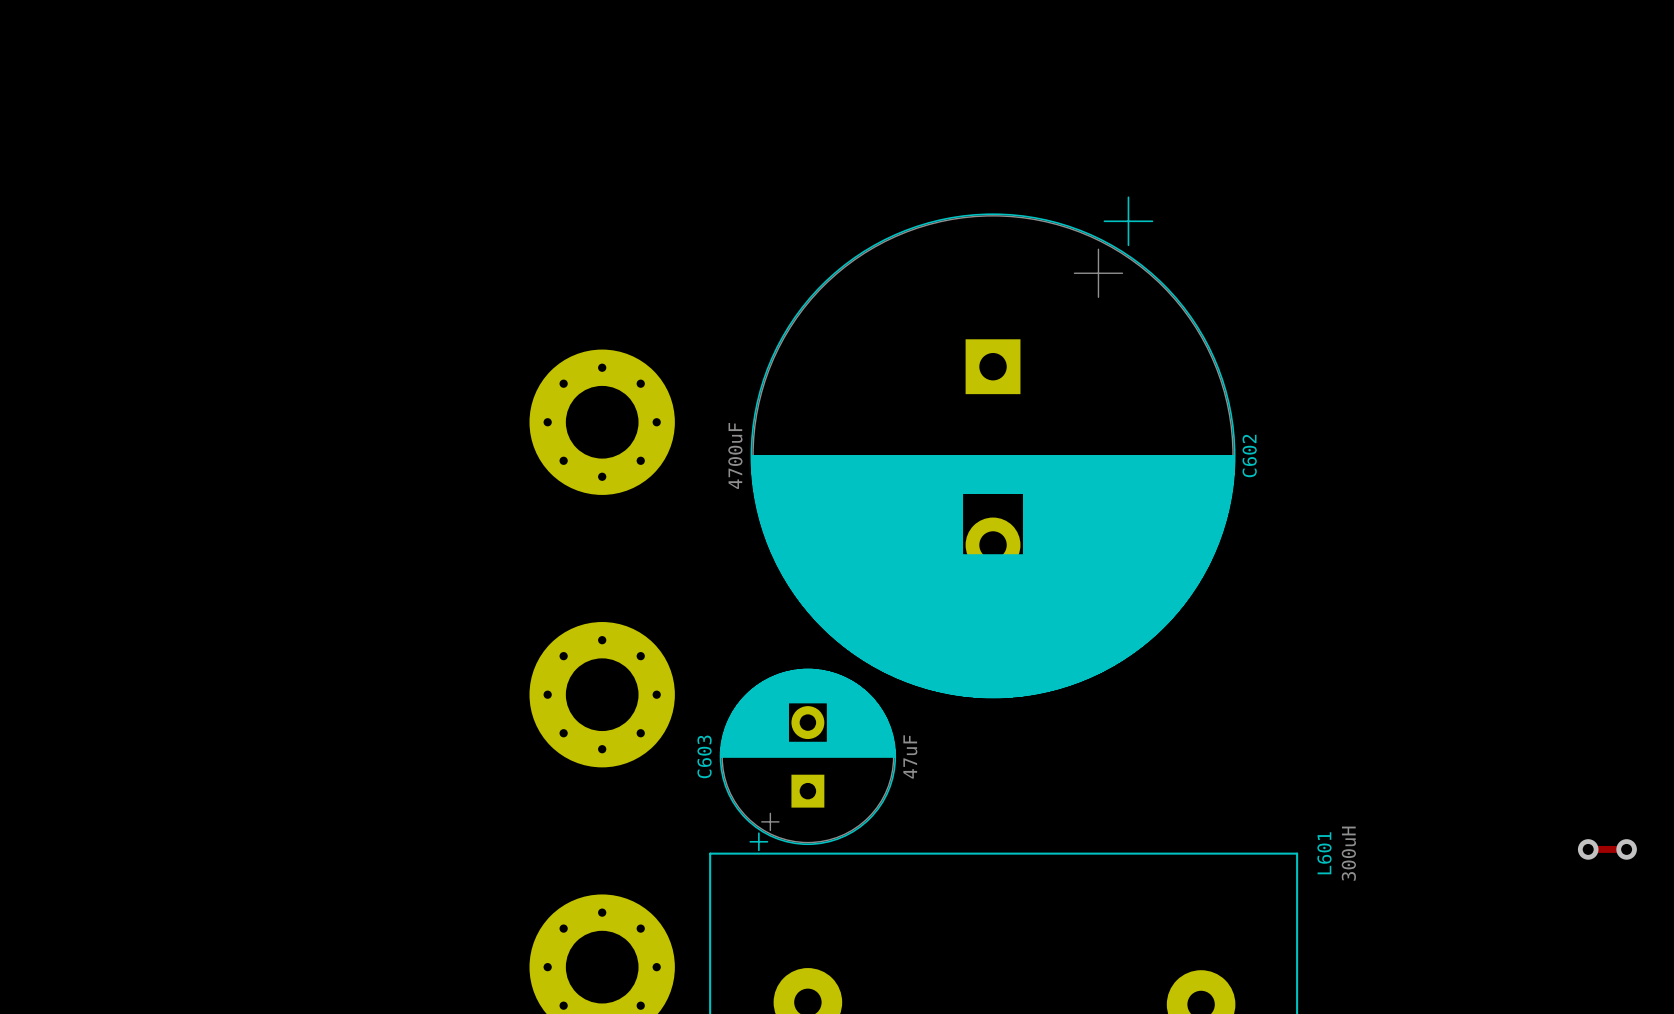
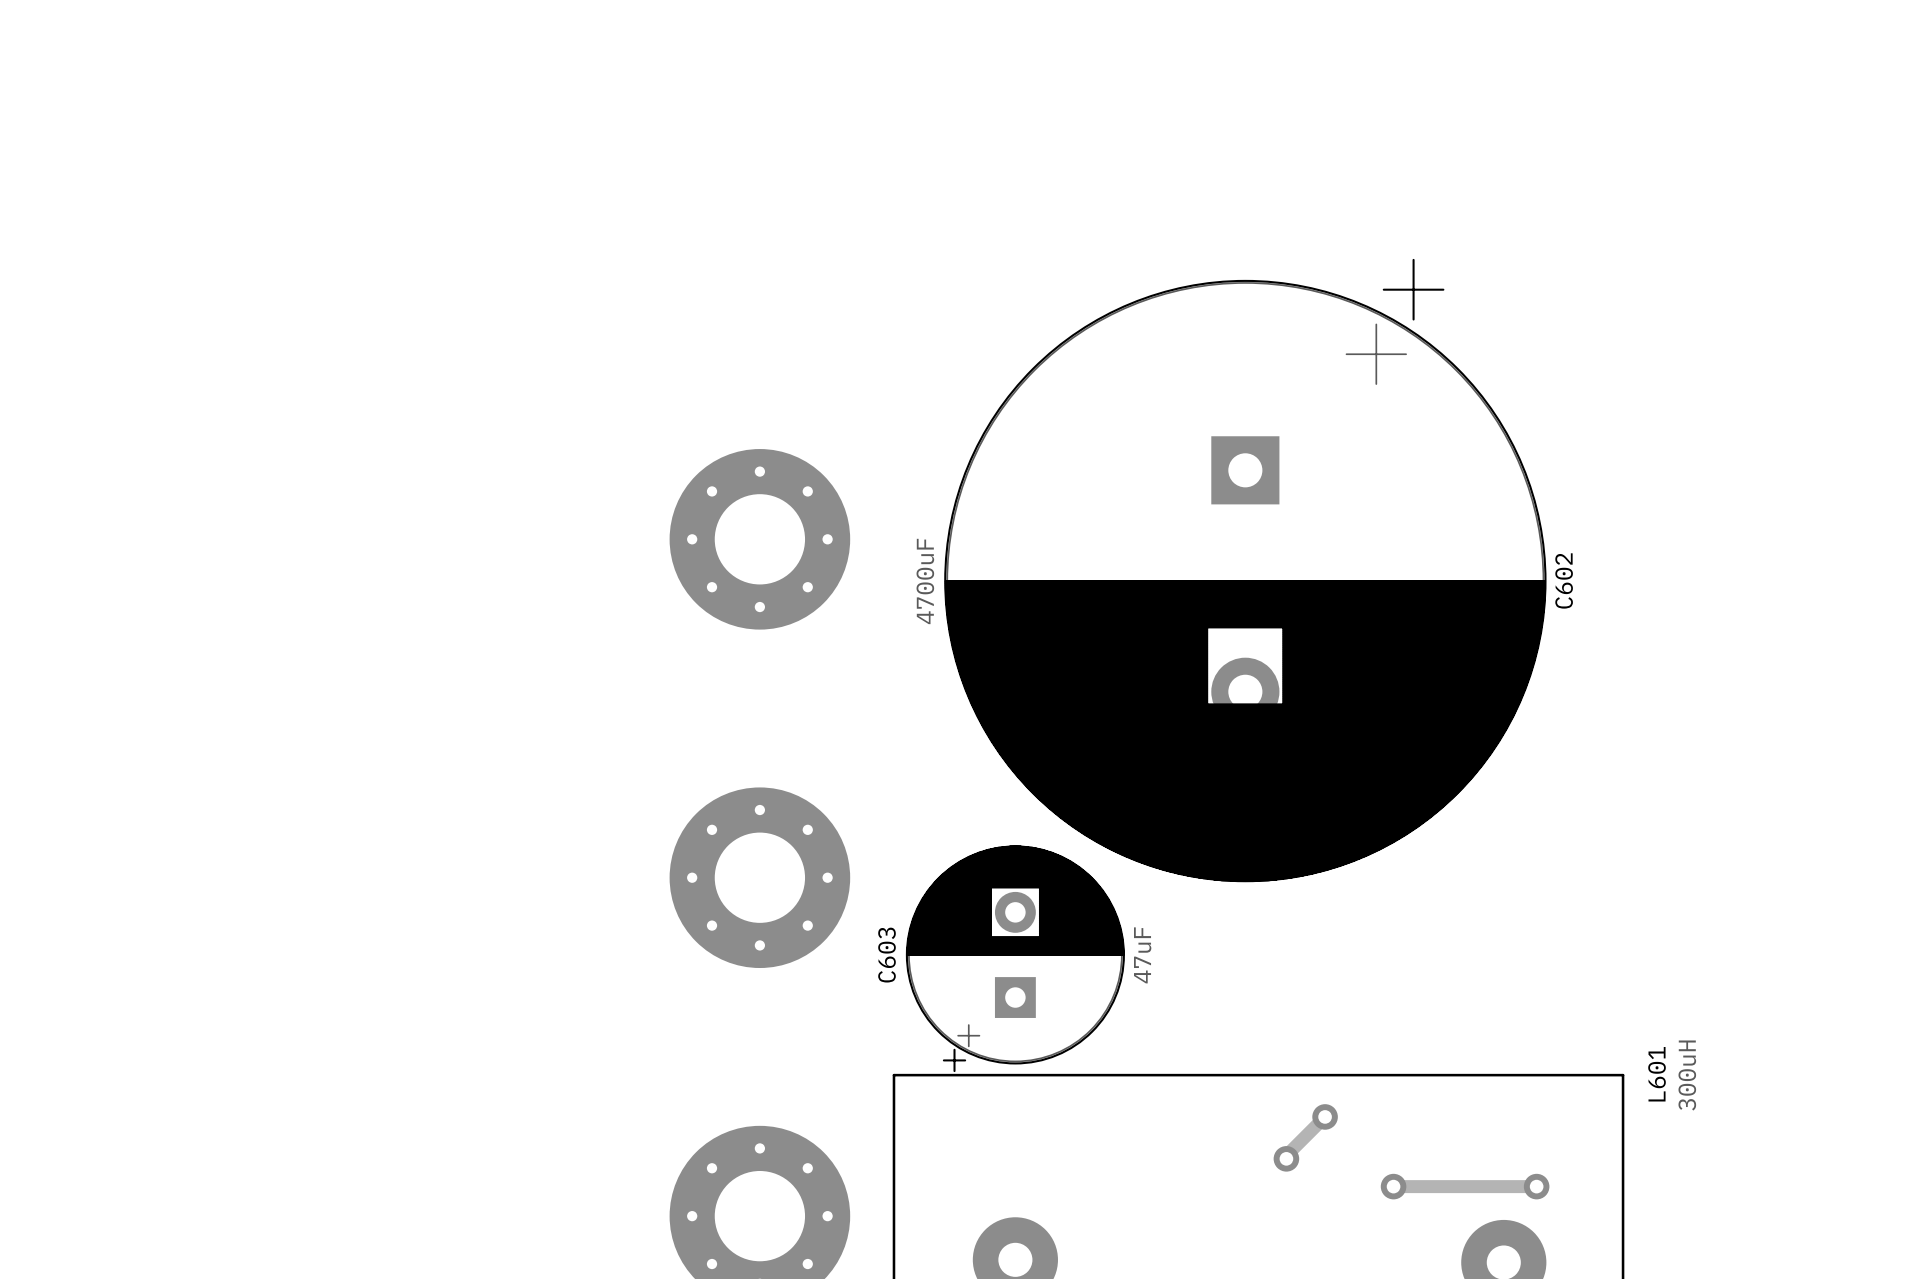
track: none -> (1325, 1116) (1286, 1155) (1286, 1158)
via: none -> (1325, 1116)
via: none -> (1286, 1158)
track: none -> (1393, 1186) (1536, 1186)
via: none -> (1393, 1186)
via: none -> (1536, 1186)

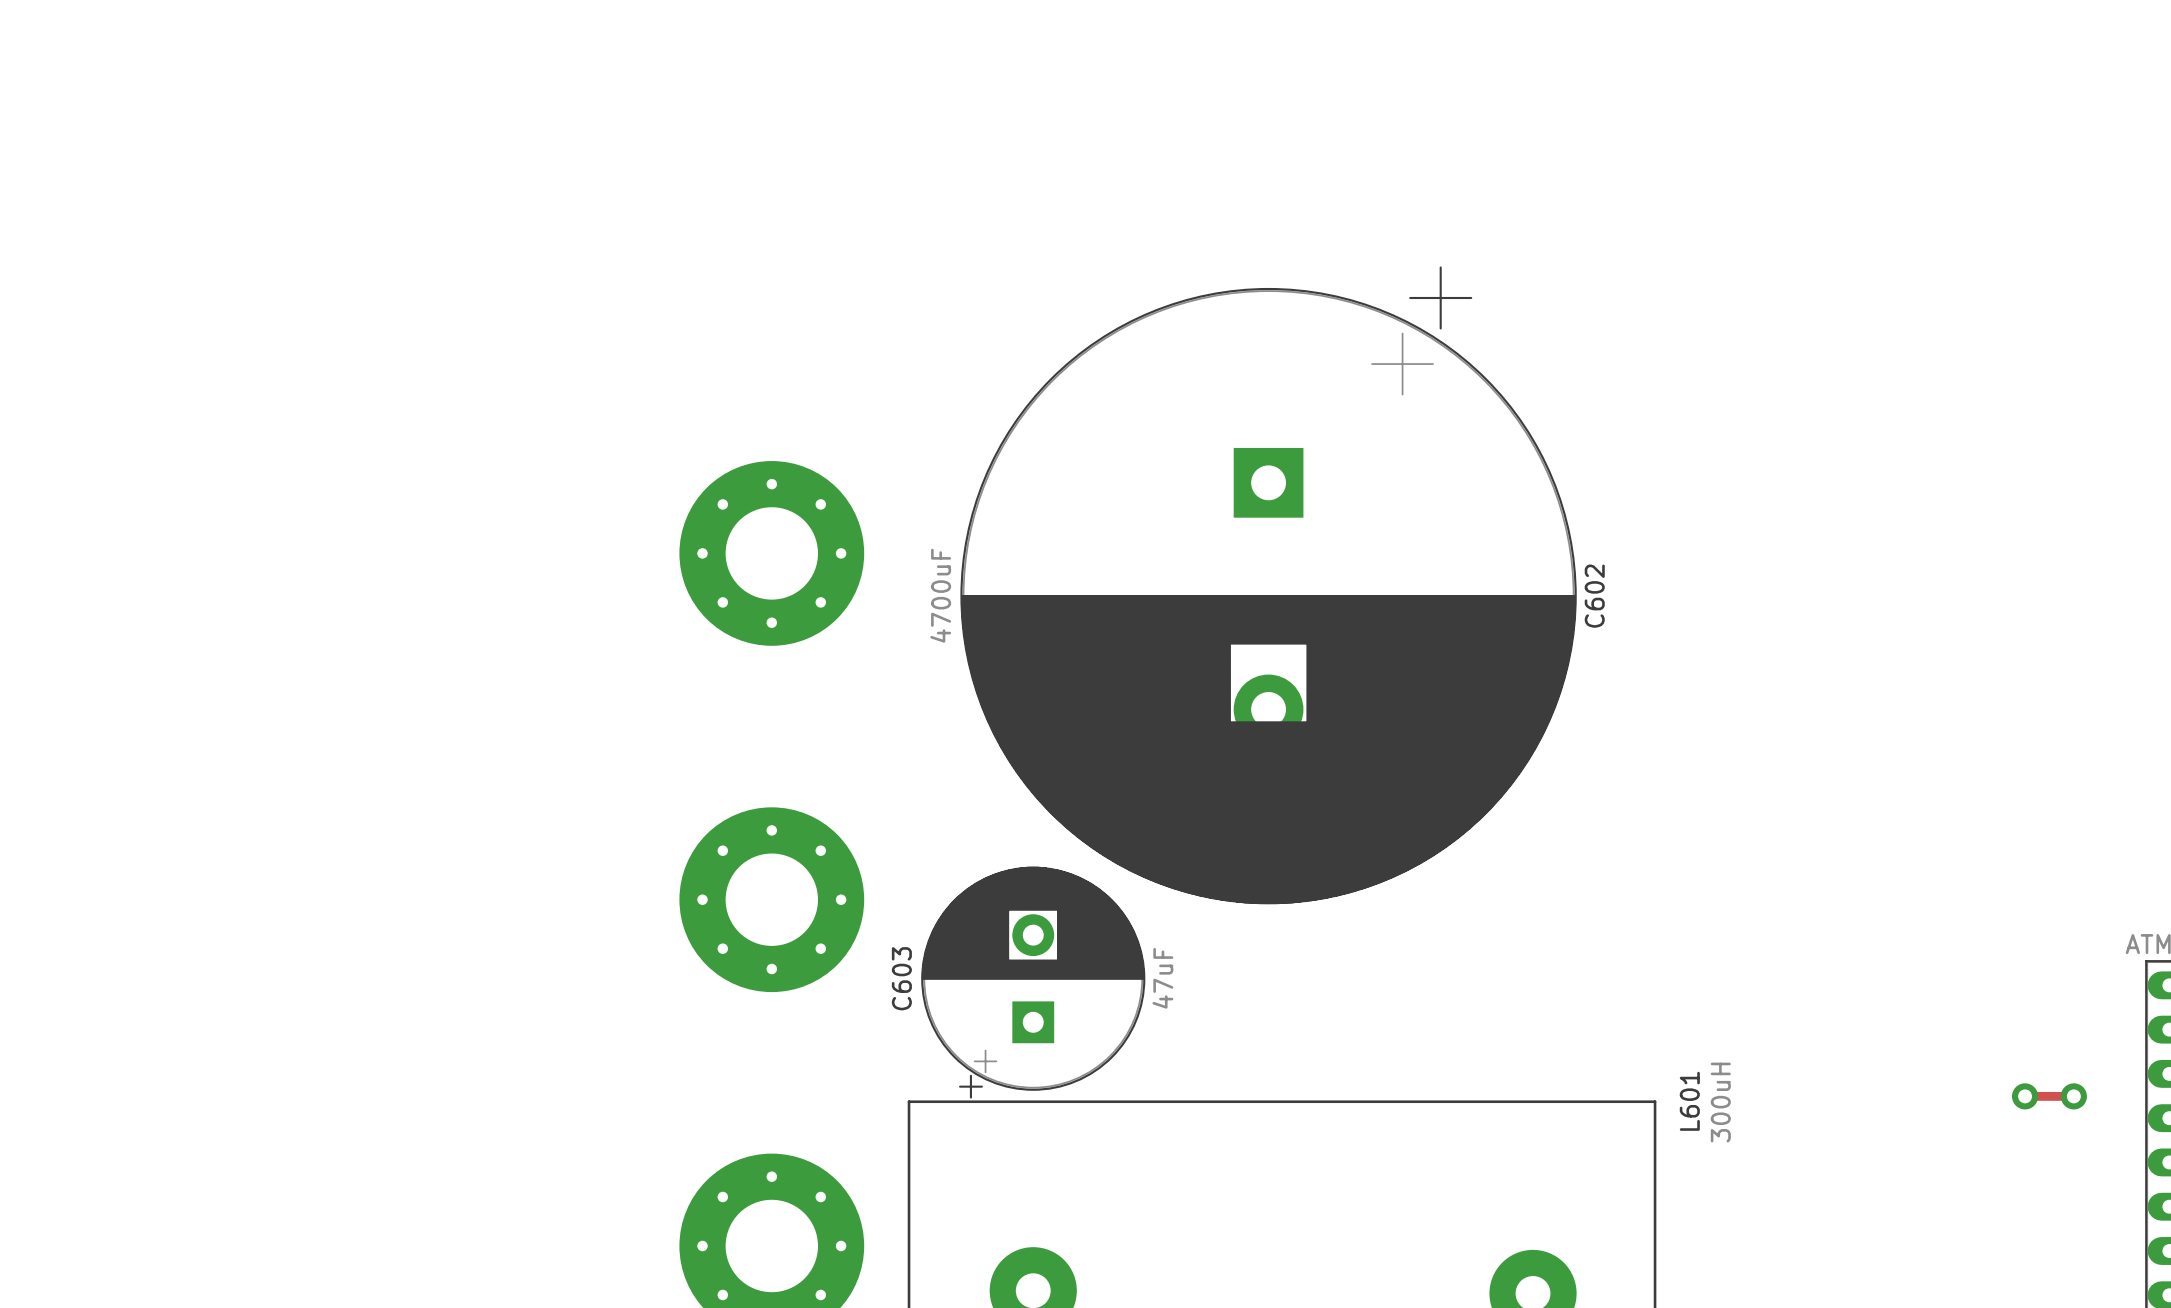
track: (1325, 1116) (1286, 1155) (1286, 1158) -> none
via: (1325, 1116) -> none
via: (1286, 1158) -> none
track: (1393, 1186) (1536, 1186) -> none
via: (1393, 1186) -> none
via: (1536, 1186) -> none

